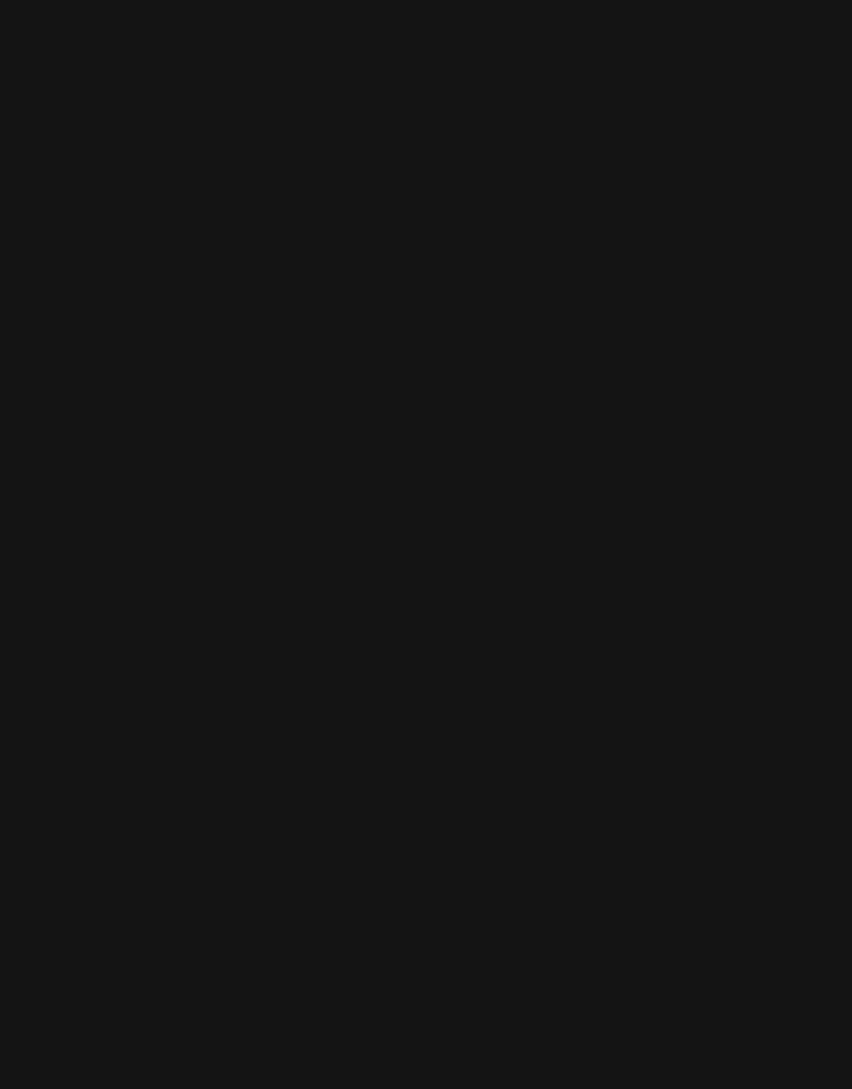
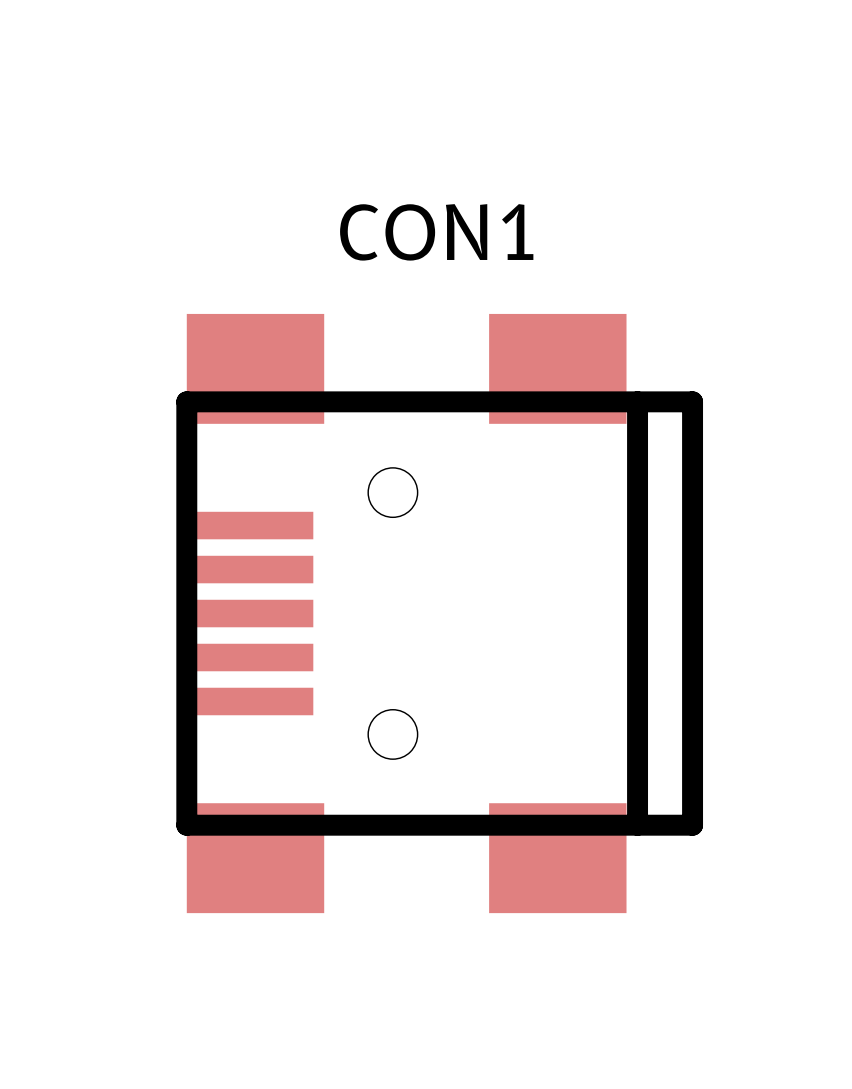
CON1: none -> (439, 613)

